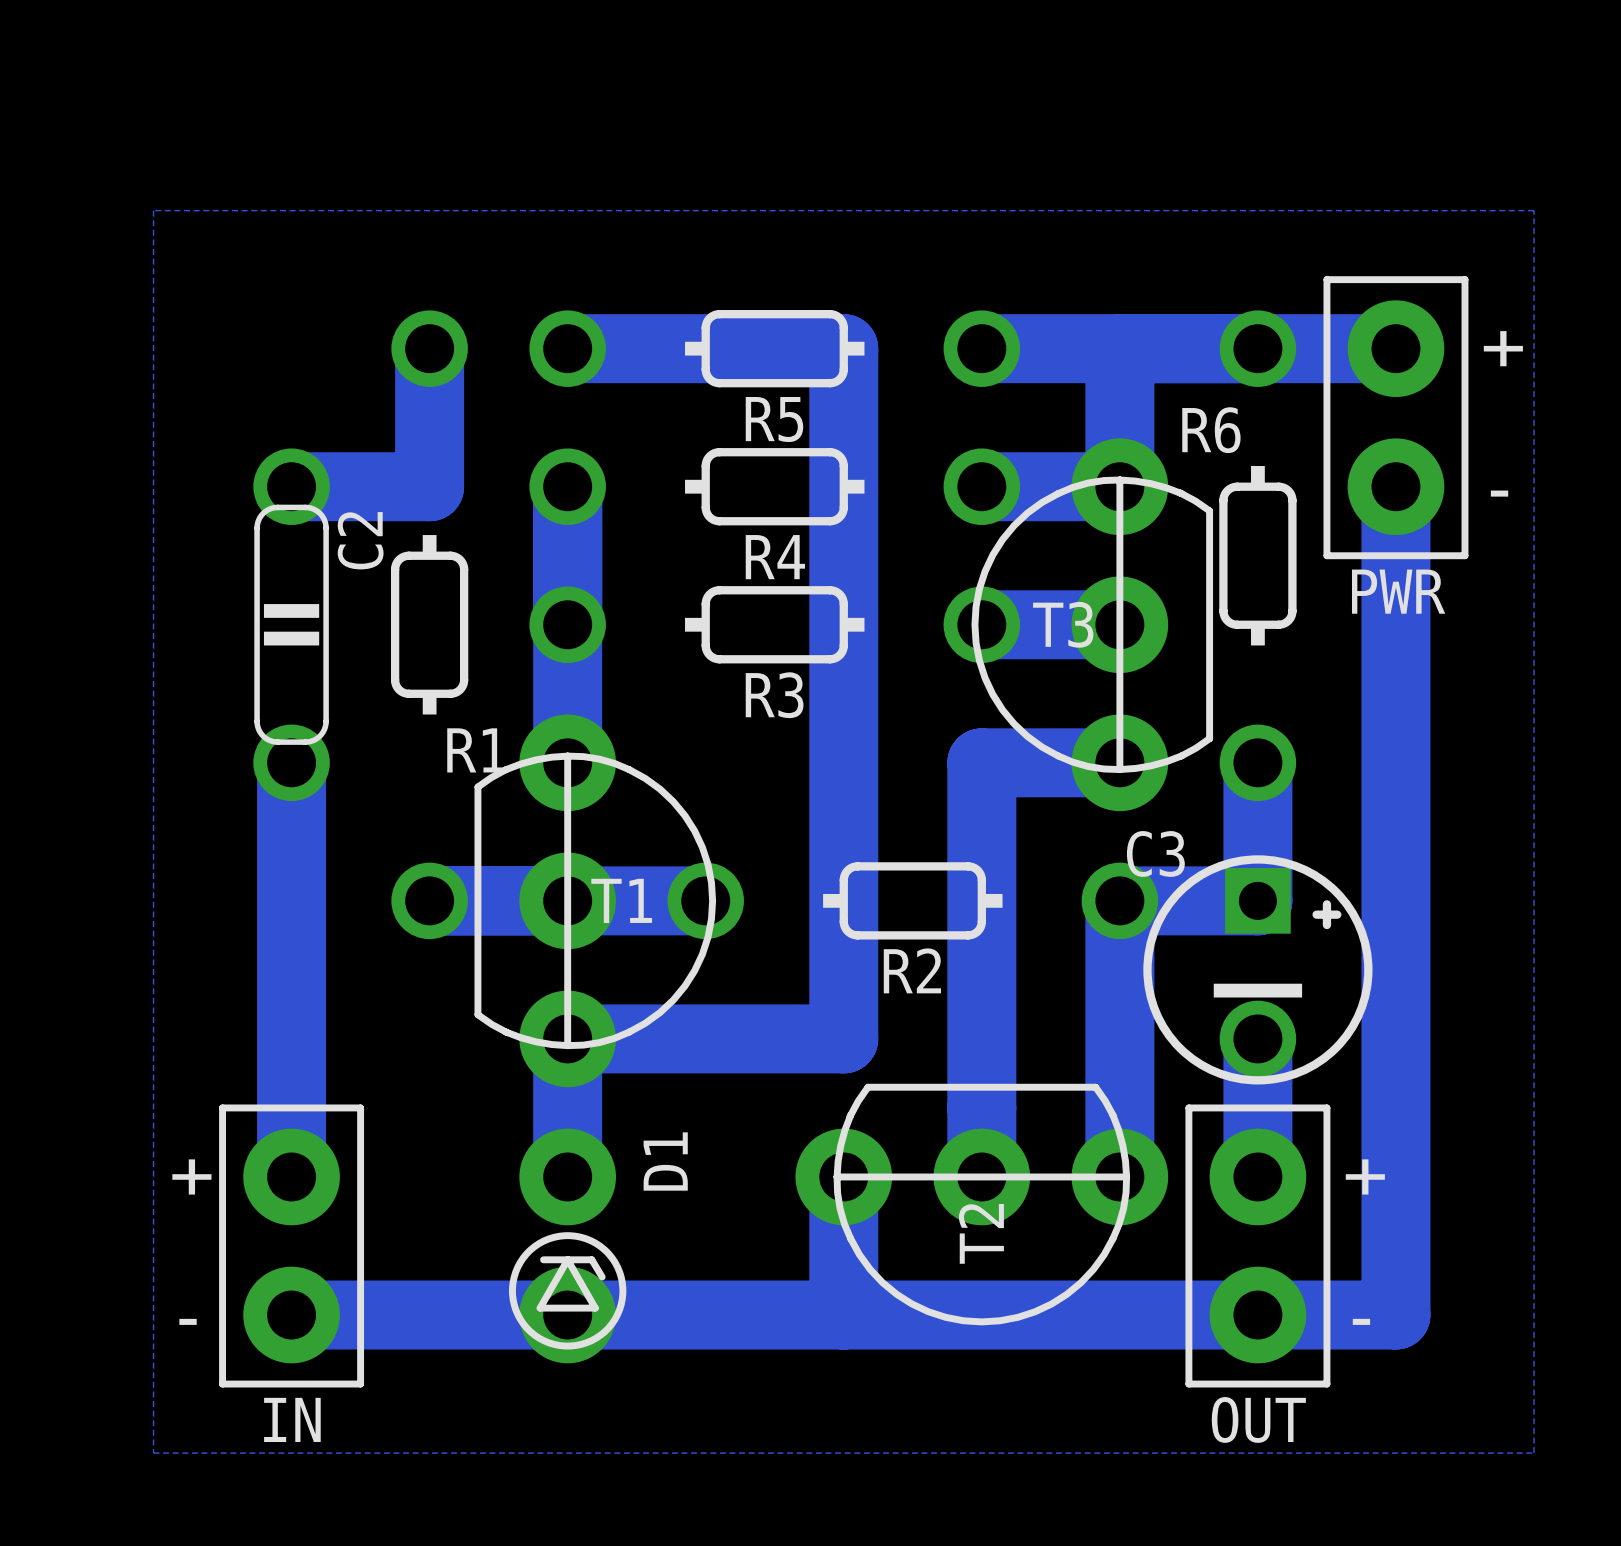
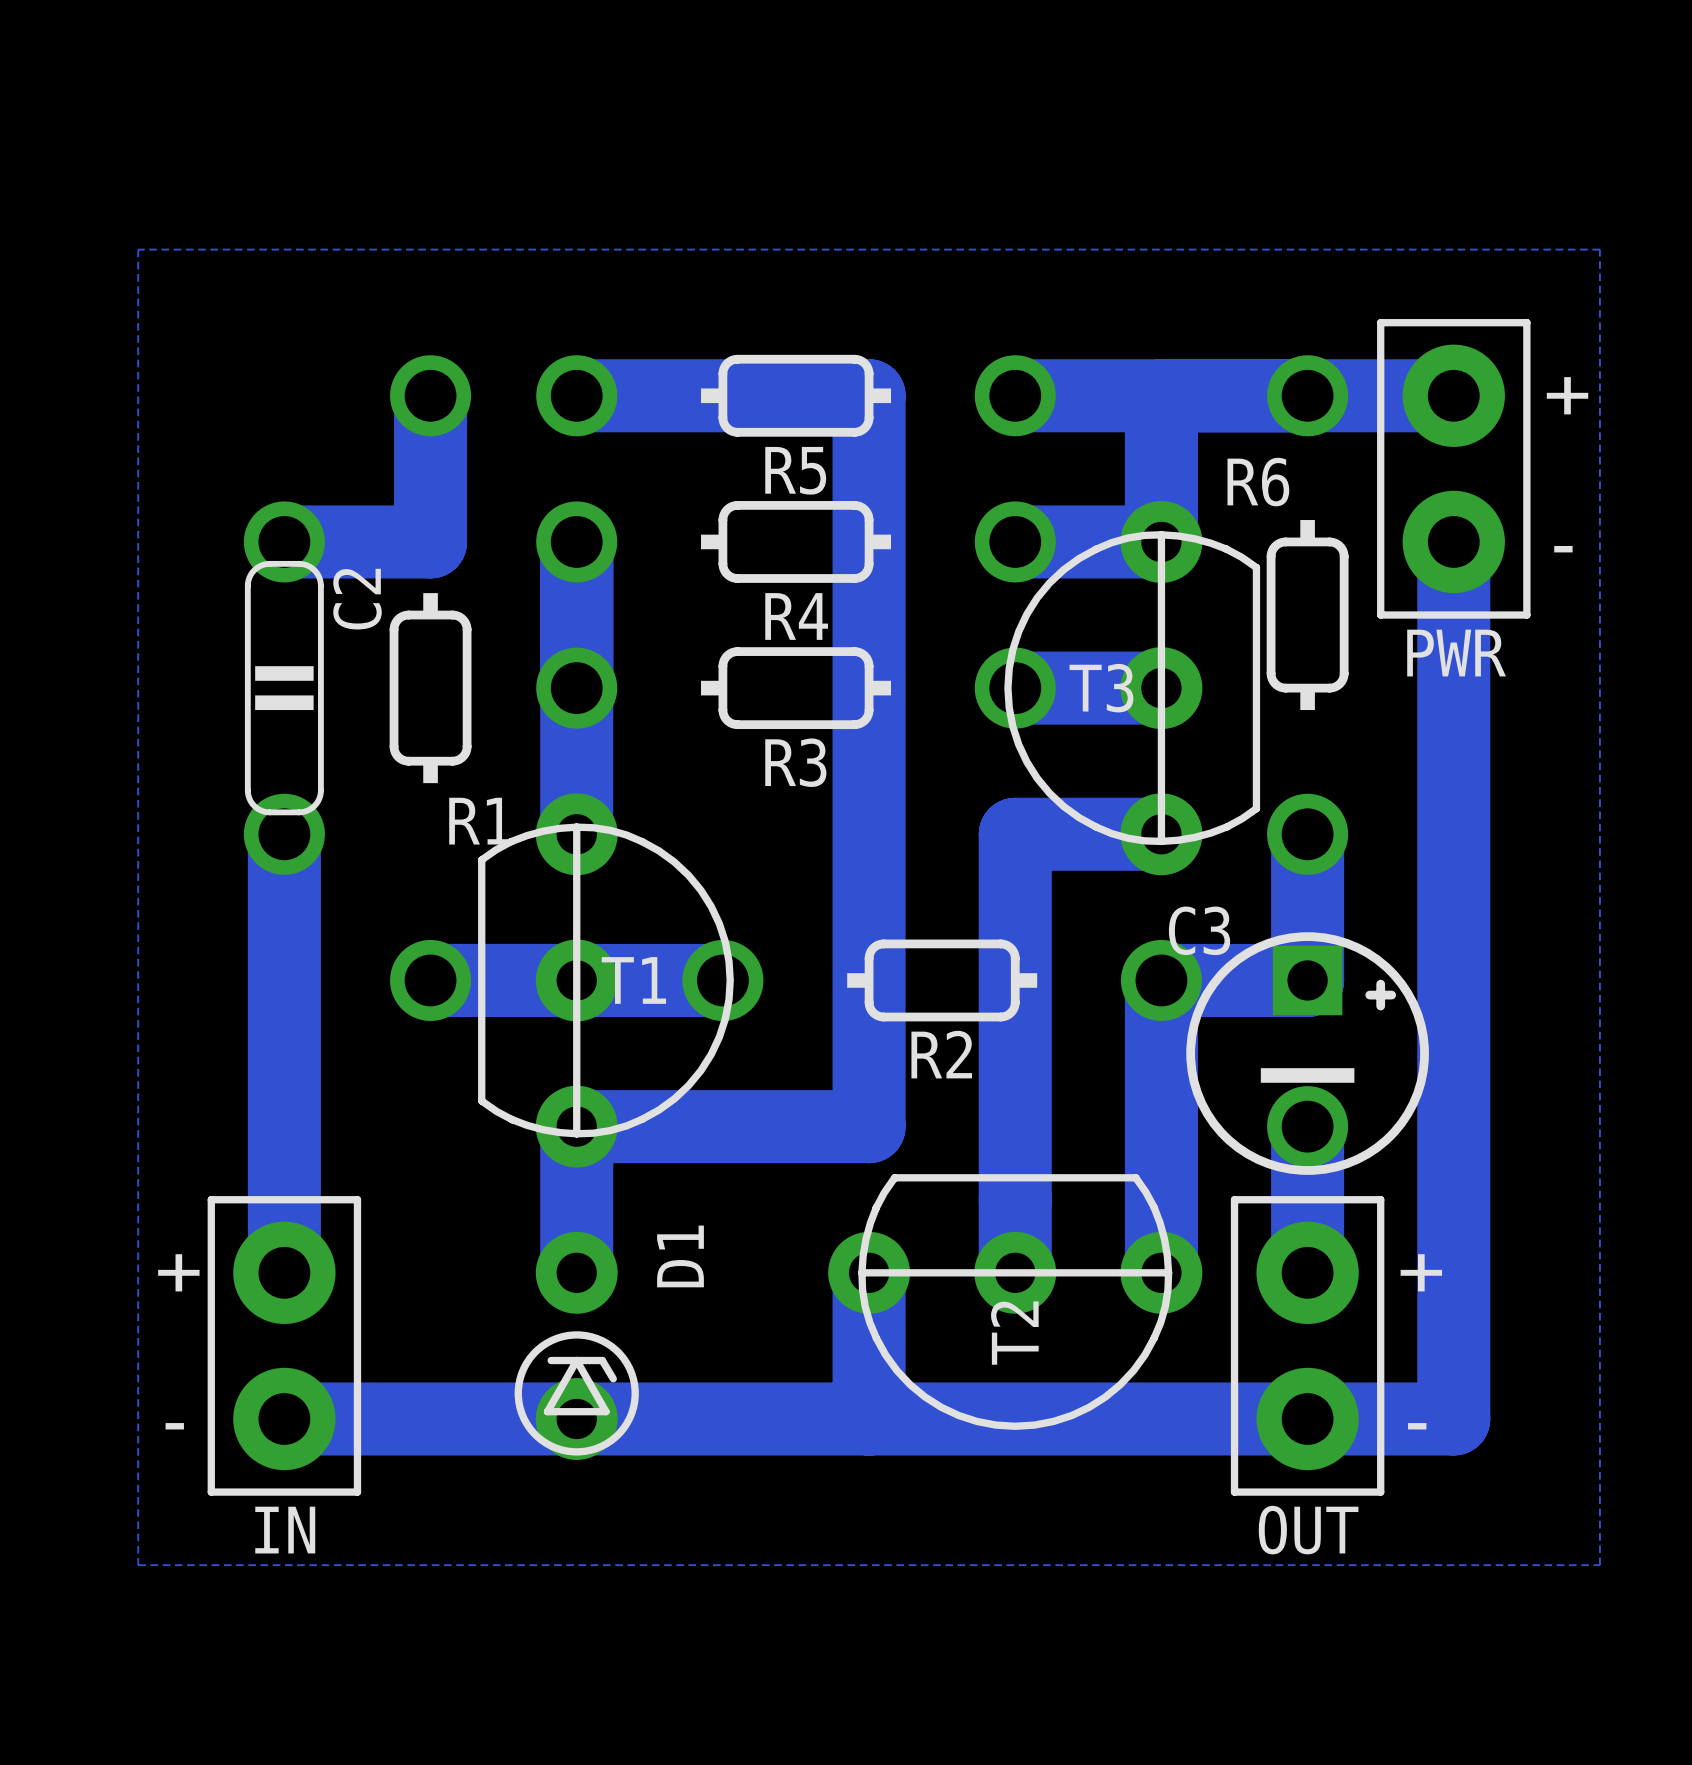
T3 footprint: [971, 438, 1214, 812] -> [1004, 501, 1261, 876]
T1 footprint: [474, 714, 717, 1088] -> [478, 793, 734, 1168]
T2 footprint: [795, 1083, 1169, 1326] -> [828, 1174, 1203, 1430]
D1 footprint: [509, 1128, 627, 1364] -> [514, 1231, 639, 1460]

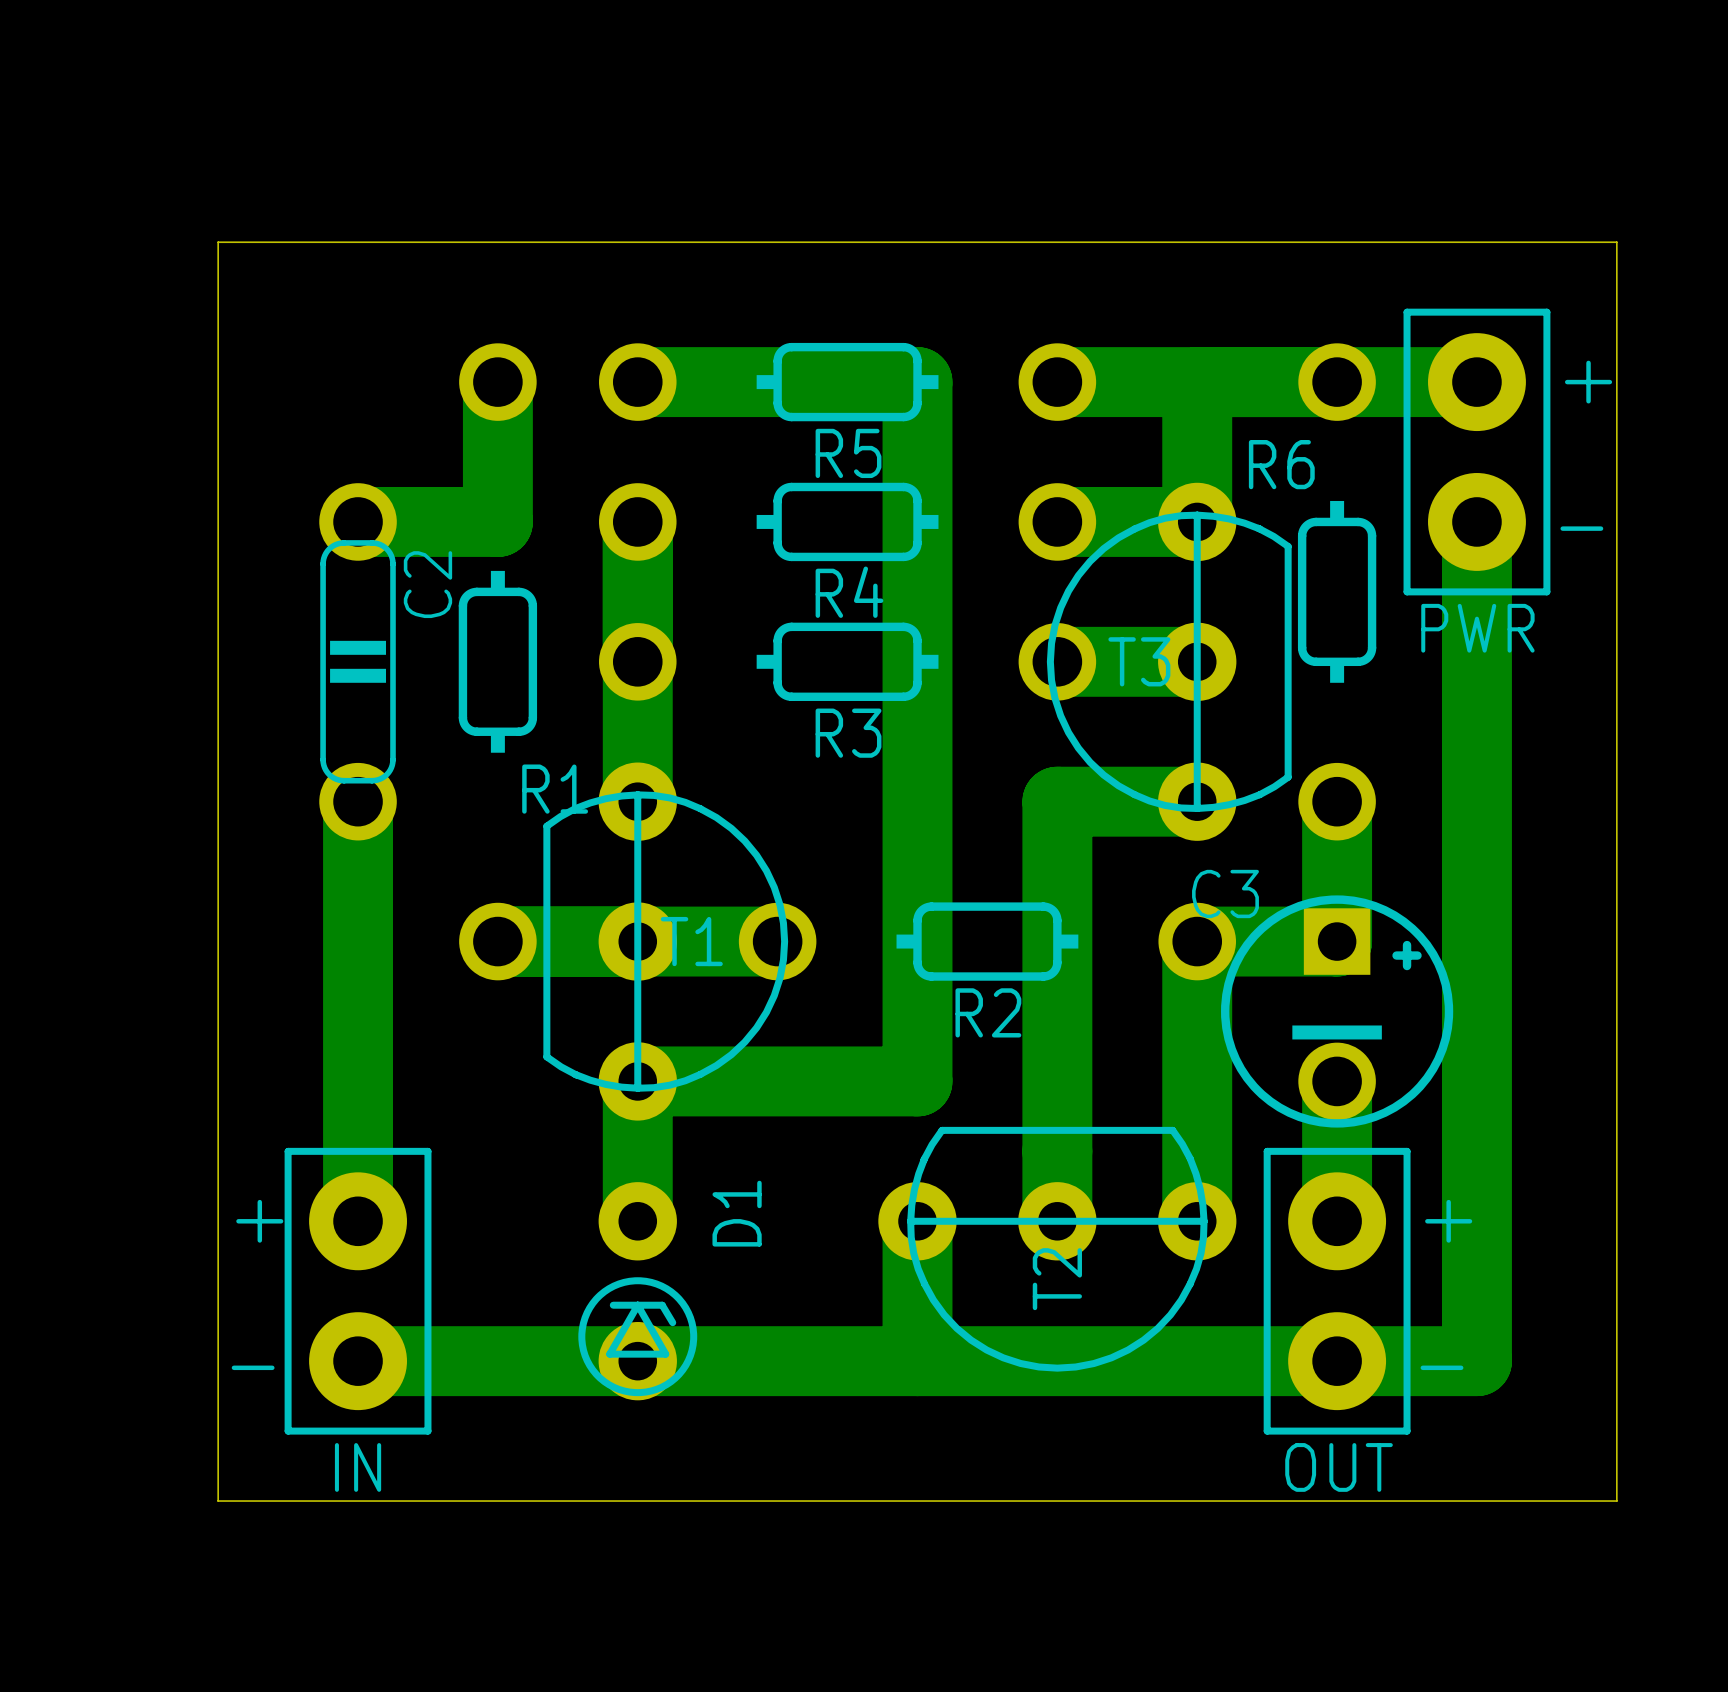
bottom zone outline: (138, 249) (138, 1565) (1599, 1565) (1599, 249) (138, 249) -> none
board edge: none -> (218, 242) (1616, 242) (1616, 1501) (218, 1501) (218, 242)

